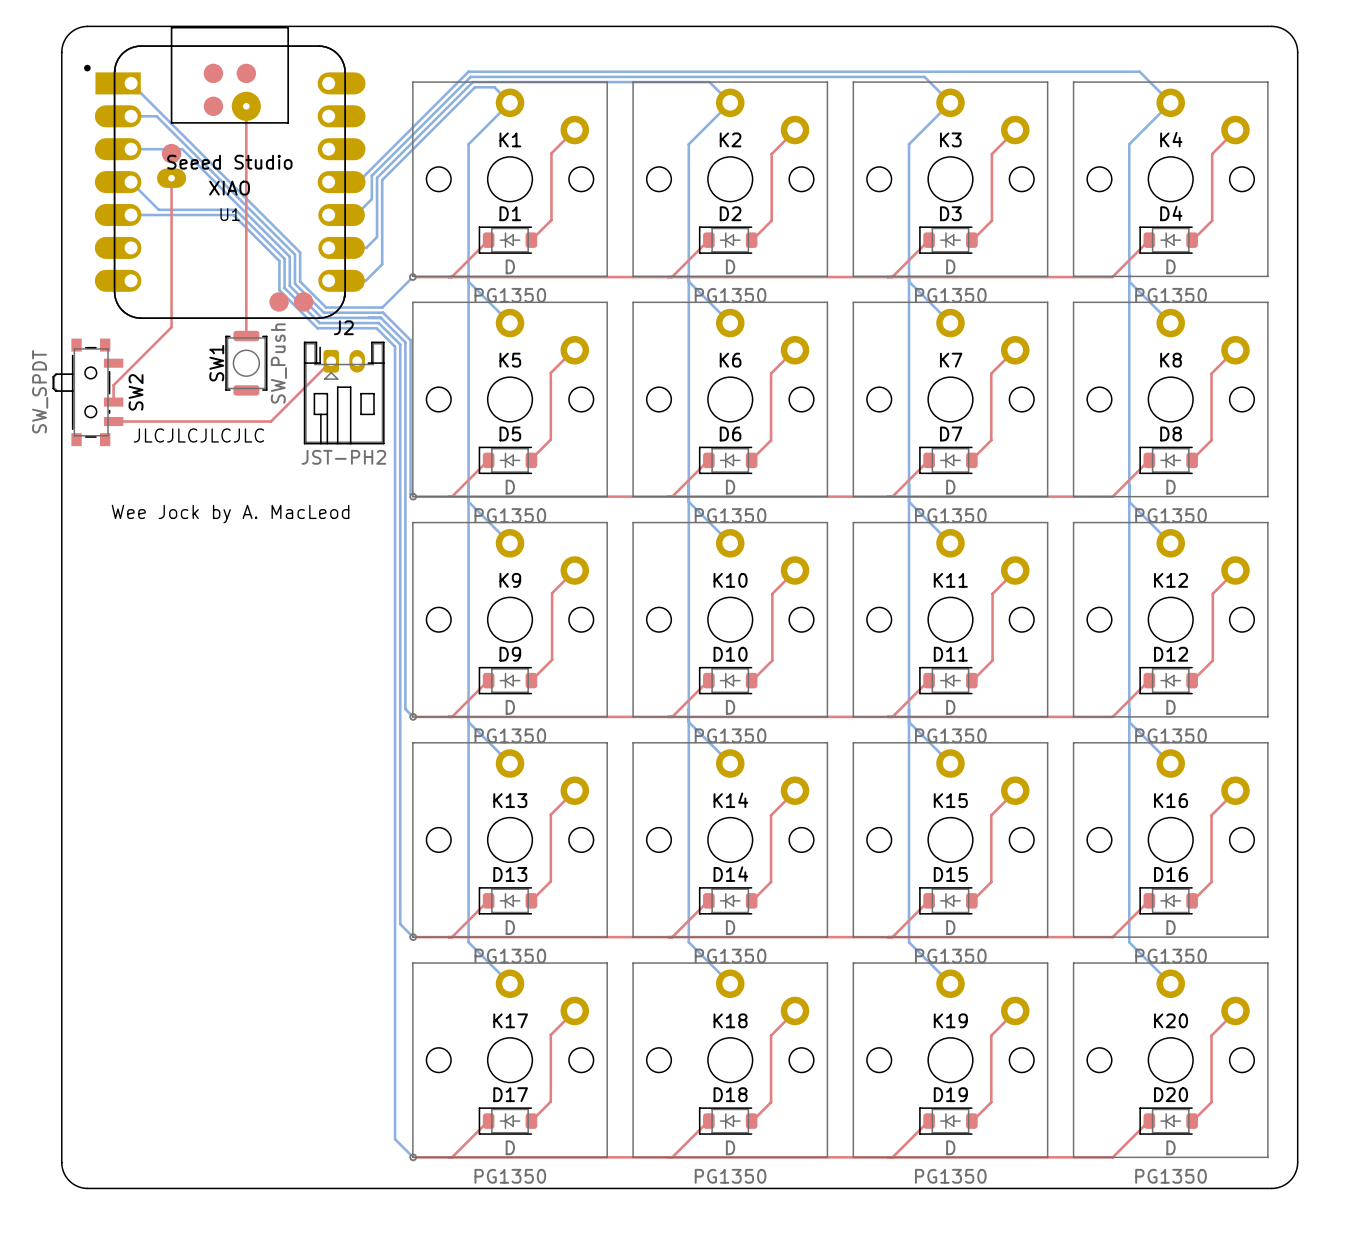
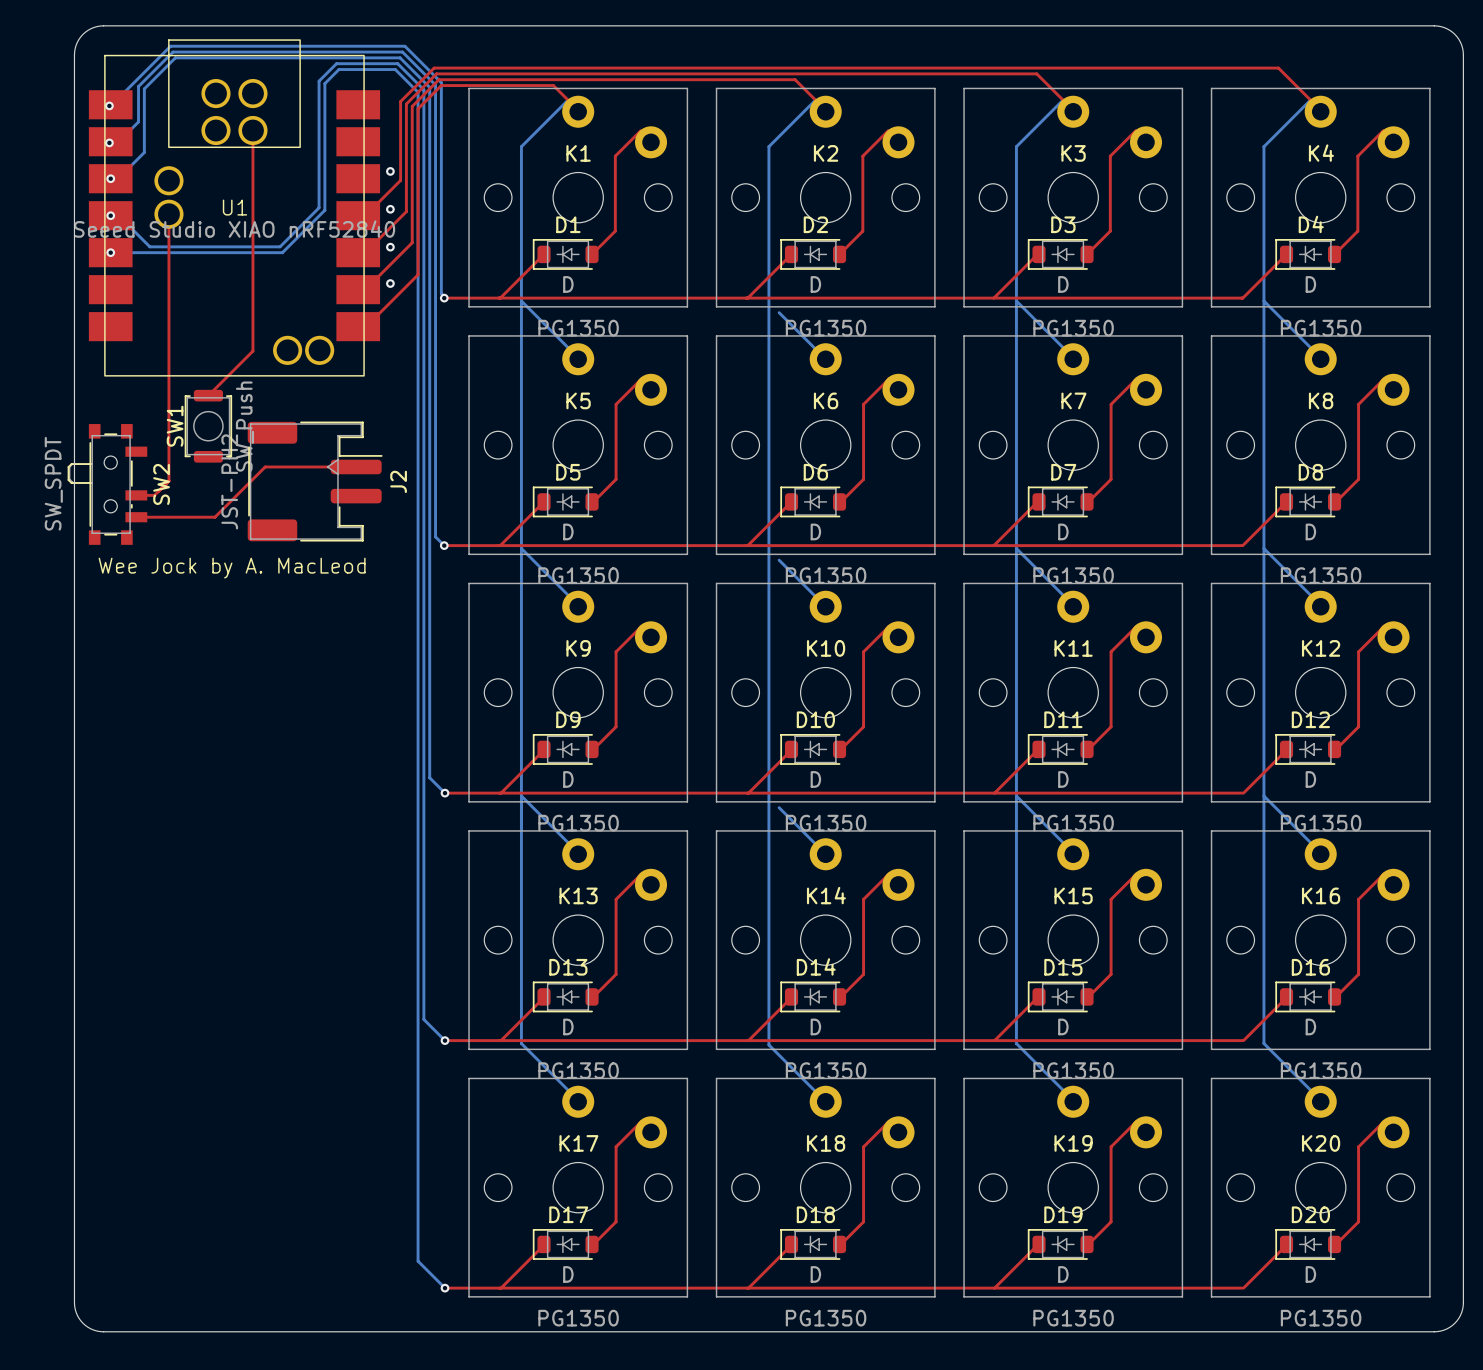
U1 footprint: [84, 26, 366, 319] -> [88, 39, 381, 377]
bottom track: (131, 83) (300, 252) (300, 281) (326, 307) (382, 307) (412, 277) -> none
top track: none -> (568, 100) (553, 85) (441, 85) (418, 108) (418, 274) (365, 327) (356, 327)
bottom track: none -> (568, 100) (521, 146) (521, 1043) (568, 1090)
top track: none -> (815, 100) (795, 79) (438, 79) (412, 106) (412, 242) (364, 290) (356, 290)
top track: none -> (1063, 100) (1036, 73) (436, 73) (406, 104) (406, 211) (364, 253) (356, 253)
bottom track: none -> (1063, 100) (1016, 146) (1016, 1043) (1063, 1090)
top track: none -> (1310, 100) (1278, 68) (434, 68) (400, 101) (400, 180) (364, 216) (356, 216)
bottom track: none -> (1310, 100) (1263, 146) (1263, 1043) (1310, 1090)
bottom track: none -> (109, 105) (170, 46) (404, 46) (441, 82) (441, 293) (444, 298)
via: none -> (109, 105)
top track: (246, 106) (246, 335) -> none
bottom track: (131, 116) (156, 116) (294, 254) (294, 283) (323, 312) (383, 312) (410, 340) (410, 494) (413, 496) -> none
top track: none -> (252, 130) (252, 351) (208, 395)
top track: none -> (640, 130) (615, 156) (615, 231) (592, 254)
top track: none -> (888, 130) (862, 156) (862, 231) (839, 254)
top track: none -> (1135, 130) (1110, 156) (1110, 231) (1087, 254)
top track: none -> (1383, 130) (1357, 156) (1357, 231) (1334, 254)
bottom track: none -> (109, 142) (117, 142) (138, 121) (138, 86) (172, 52) (402, 52) (435, 85) (435, 536) (444, 545)
via: none -> (109, 142)
top track: (574, 130) (551, 153) (551, 220) (531, 240) -> none
top track: (795, 130) (771, 153) (771, 220) (751, 240) -> none
top track: (1015, 130) (991, 153) (991, 220) (971, 240) -> none
top track: (1235, 130) (1212, 153) (1212, 220) (1192, 240) -> none
bottom track: (131, 149) (182, 149) (289, 256) (289, 285) (321, 317) (380, 317) (405, 342) (405, 709) (413, 716) -> none
via: none -> (390, 171)
bottom track: none -> (110, 178) (118, 178) (144, 152) (144, 88) (175, 57) (400, 57) (429, 87) (429, 777) (445, 793)
via: none -> (110, 178)
top track: (171, 178) (171, 327) (113, 385) (113, 402) -> none
bottom track: (131, 182) (158, 209) (235, 209) (284, 258) (284, 288) (319, 323) (378, 323) (400, 344) (400, 924) (413, 937) -> none
bottom track: (328, 182) (358, 182) (468, 71) (1139, 71) (1170, 102) (1129, 144) (1129, 942) (1170, 983) -> none
via: none -> (390, 209)
top track: none -> (168, 214) (168, 480)
via: none -> (110, 215)
bottom track: none -> (118, 215) (149, 246) (280, 246) (319, 207) (319, 81) (336, 63) (397, 63) (423, 89) (423, 1019) (445, 1040)
U1 value: none -> Seeed Studio XIAO nRF52840 (234, 229)
U1 name position: U1 (230, 214) -> U1 (234, 207)
bottom track: (131, 215) (233, 215) (279, 261) (279, 290) (317, 328) (376, 328) (395, 346) (395, 1139) (413, 1157) -> none
bottom track: (328, 215) (355, 215) (371, 199) (371, 175) (470, 76) (924, 76) (950, 102) (909, 144) (909, 942) (950, 983) -> none
via: none -> (390, 247)
bottom track: none -> (110, 252) (282, 252) (324, 210) (324, 83) (338, 69) (395, 69) (418, 92) (418, 1261) (445, 1288)
via: none -> (110, 252)
top track: none -> (544, 254) (500, 298)
top track: none -> (791, 254) (747, 298)
top track: none -> (1037, 254) (993, 298)
top track: none -> (1286, 254) (1242, 298) (444, 298)
top track: (488, 240) (451, 277) -> none
D1 position: (507, 240) -> (565, 254)
top track: (708, 240) (671, 277) -> none
D2 position: (728, 240) -> (813, 254)
top track: (929, 240) (892, 277) -> none
D3 position: (948, 240) -> (1060, 254)
top track: (1149, 240) (1112, 277) (412, 277) -> none
D4 position: (1168, 240) -> (1308, 254)
bottom track: (328, 247) (366, 247) (377, 237) (377, 177) (472, 82) (709, 82) (730, 102) (688, 144) (688, 942) -> (815, 100) (768, 146) (768, 1044) (779, 1055)
via: none -> (390, 283)
via position: (412, 277) -> (444, 298)
bottom track: (328, 280) (365, 280) (382, 264) (382, 180) (475, 87) (494, 87) (510, 102) (468, 144) (468, 942) (510, 983) -> none
bottom track: (468, 281) (510, 323) -> (521, 301) (568, 347)
bottom track: (909, 281) (950, 323) -> (1016, 301) (1063, 347)
bottom track: (1129, 281) (1170, 323) -> (1263, 301) (1310, 347)
J2 name position: J2 (343, 327) -> J2 (398, 481)
top track: none -> (641, 378) (616, 404) (616, 479) (592, 502)
top track: none -> (889, 378) (863, 404) (863, 479) (840, 502)
top track: none -> (1136, 378) (1111, 404) (1111, 479) (1087, 502)
top track: none -> (1384, 378) (1358, 404) (1358, 479) (1335, 502)
J2 footprint: [303, 341, 385, 445] -> [247, 421, 383, 542]
top track: (574, 349) (550, 372) (550, 439) (530, 459) -> none
top track: (794, 350) (771, 373) (771, 440) (750, 460) -> none
top track: (1014, 350) (991, 373) (991, 440) (971, 460) -> none
top track: (1234, 350) (1211, 373) (1211, 440) (1191, 460) -> none
top track: (331, 361) (271, 421) (113, 421) -> none
SW1 position: (246, 363) -> (208, 426)
SW2 position: (87, 392) -> (107, 484)
top track: none -> (356, 466) (265, 466) (214, 517) (136, 517)
top track: none -> (169, 480) (154, 495) (136, 495)
text: JLCJLCJLCJLC (198, 435) -> none
top track: none -> (544, 501) (500, 545)
top track: none -> (791, 501) (747, 545)
top track: none -> (1037, 501) (993, 545)
top track: none -> (1286, 501) (1242, 545)
J2 value position: JST-PH2 (343, 457) -> JST-PH2 (229, 481)
top track: (488, 459) (452, 496) -> none
top track: (709, 459) (672, 496) -> none
top track: (929, 459) (892, 496) -> none
top track: (1149, 459) (1112, 496) (413, 496) -> none
D5 position: (507, 460) -> (565, 501)
D6 position: (728, 460) -> (813, 501)
D7 position: (948, 460) -> (1060, 501)
D8 position: (1168, 460) -> (1308, 501)
top track: none -> (444, 545) (1241, 545)
via position: (413, 496) -> (444, 545)
bottom track: (468, 501) (510, 543) -> (521, 548) (568, 595)
bottom track: (909, 501) (950, 543) -> (1016, 548) (1063, 595)
bottom track: (1129, 501) (1170, 543) -> (1263, 548) (1310, 595)
text position: Wee Jock by A. MacLeod (230, 514) -> Wee Jock by A. MacLeod (232, 568)
top track: none -> (641, 626) (616, 651) (616, 726) (592, 750)
top track: none -> (889, 626) (863, 651) (863, 726) (840, 750)
top track: none -> (1136, 626) (1111, 651) (1111, 726) (1087, 750)
top track: none -> (1384, 626) (1358, 651) (1358, 726) (1335, 750)
top track: (575, 569) (552, 593) (552, 659) (532, 679) -> none
top track: (795, 570) (772, 593) (772, 660) (752, 680) -> none
top track: (1015, 570) (992, 593) (992, 660) (972, 680) -> none
top track: (1236, 570) (1212, 593) (1212, 660) (1192, 680) -> none
top track: none -> (544, 749) (501, 793)
top track: none -> (792, 749) (748, 793)
top track: none -> (1038, 749) (994, 793)
top track: none -> (1287, 749) (1243, 793)
top track: (488, 679) (452, 716) -> none
top track: (709, 679) (672, 716) -> none
top track: (929, 679) (892, 716) -> none
top track: (1149, 679) (1112, 716) (413, 716) -> none
D9 position: (507, 680) -> (565, 749)
D10 position: (728, 680) -> (813, 749)
D11 position: (948, 680) -> (1060, 749)
D12 position: (1168, 680) -> (1308, 749)
top track: none -> (445, 793) (1242, 793)
via position: (413, 716) -> (445, 793)
bottom track: (468, 722) (510, 763) -> (521, 796) (568, 842)
bottom track: (909, 722) (950, 763) -> (1016, 796) (1063, 842)
bottom track: (1129, 722) (1170, 763) -> (1263, 796) (1310, 842)
top track: none -> (641, 873) (616, 899) (616, 974) (592, 997)
top track: none -> (889, 873) (863, 899) (863, 974) (840, 997)
top track: none -> (1136, 873) (1111, 899) (1111, 974) (1087, 997)
top track: none -> (1384, 873) (1358, 899) (1358, 974) (1335, 997)
top track: (574, 791) (550, 814) (550, 881) (530, 901) -> none
top track: (794, 792) (771, 815) (771, 882) (750, 902) -> none
top track: (1014, 792) (991, 815) (991, 882) (971, 902) -> none
top track: (1234, 792) (1211, 815) (1211, 882) (1191, 902) -> none
top track: none -> (544, 996) (501, 1040)
top track: none -> (792, 996) (748, 1040)
top track: none -> (1038, 996) (994, 1040)
top track: none -> (1287, 996) (1243, 1040)
top track: (488, 900) (452, 937) -> none
D13 position: (507, 900) -> (565, 996)
top track: (709, 900) (672, 937) -> none
D14 position: (728, 900) -> (813, 996)
top track: (929, 900) (892, 937) -> none
D15 position: (948, 900) -> (1060, 996)
top track: (1149, 900) (1112, 937) (413, 937) -> none
D16 position: (1168, 900) -> (1308, 996)
top track: none -> (445, 1040) (1242, 1040)
via position: (413, 937) -> (445, 1040)
top track: none -> (641, 1121) (616, 1146) (616, 1221) (592, 1245)
top track: none -> (889, 1121) (863, 1146) (863, 1221) (840, 1245)
top track: none -> (1136, 1121) (1111, 1146) (1111, 1221) (1087, 1245)
top track: none -> (1384, 1121) (1358, 1146) (1358, 1221) (1335, 1245)
top track: (574, 1011) (550, 1034) (550, 1101) (530, 1121) -> none
top track: (794, 1012) (771, 1035) (771, 1102) (750, 1122) -> none
top track: (1014, 1012) (991, 1035) (991, 1102) (971, 1122) -> none
top track: (1234, 1012) (1211, 1035) (1211, 1102) (1191, 1122) -> none
top track: none -> (544, 1244) (501, 1288)
top track: none -> (792, 1244) (748, 1288)
top track: none -> (1038, 1244) (994, 1288)
top track: none -> (1287, 1244) (1243, 1288)
top track: (488, 1120) (452, 1157) -> none
top track: (709, 1120) (672, 1157) -> none
top track: (929, 1120) (892, 1157) -> none
top track: (1149, 1120) (1112, 1157) (413, 1157) -> none
D17 position: (507, 1121) -> (565, 1244)
D18 position: (728, 1121) -> (813, 1244)
D19 position: (948, 1121) -> (1060, 1244)
D20 position: (1168, 1121) -> (1308, 1244)
top track: none -> (445, 1288) (1242, 1288)
via position: (413, 1157) -> (445, 1288)

